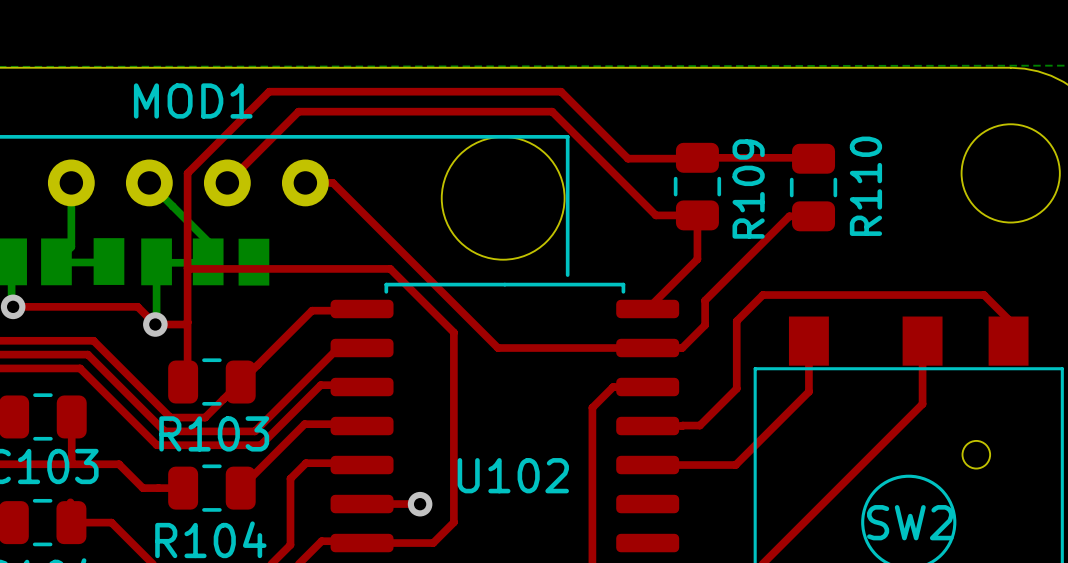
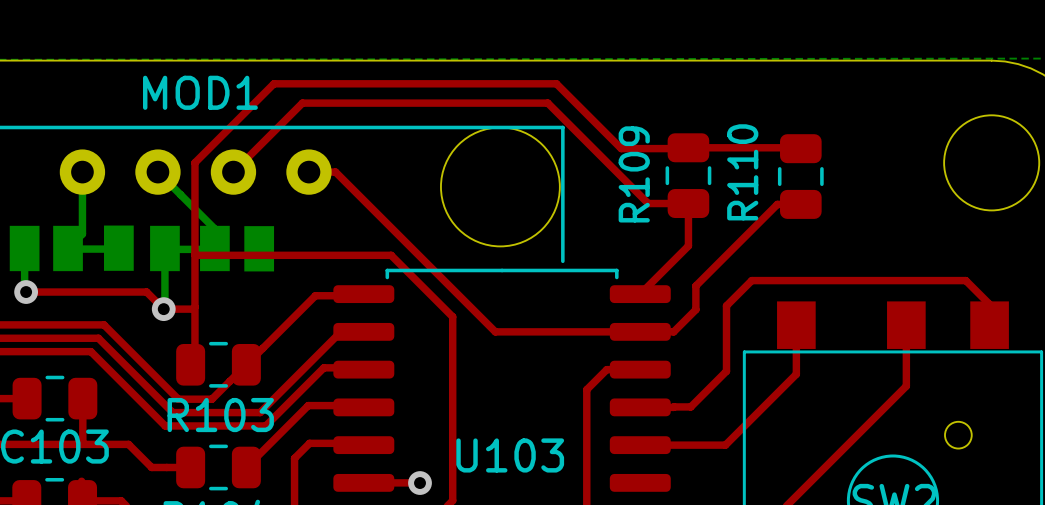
R110 name position: R110 (865, 186) -> R110 (742, 172)
R109 name position: R109 (748, 189) -> R109 (634, 174)
U102 name: U102 (513, 475) -> U103 (510, 455)

